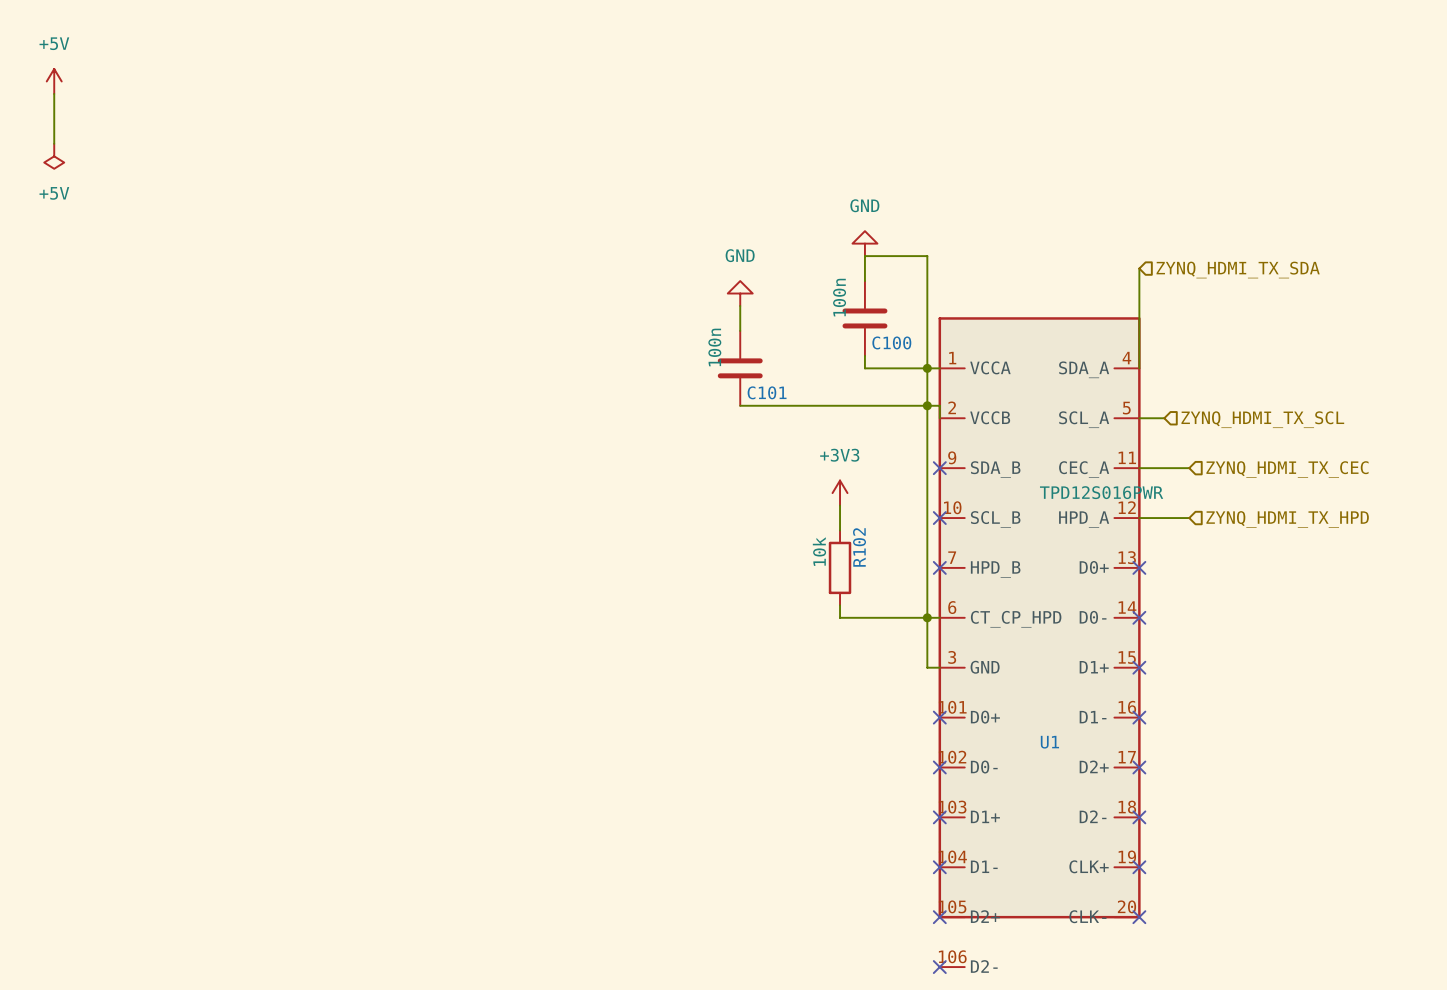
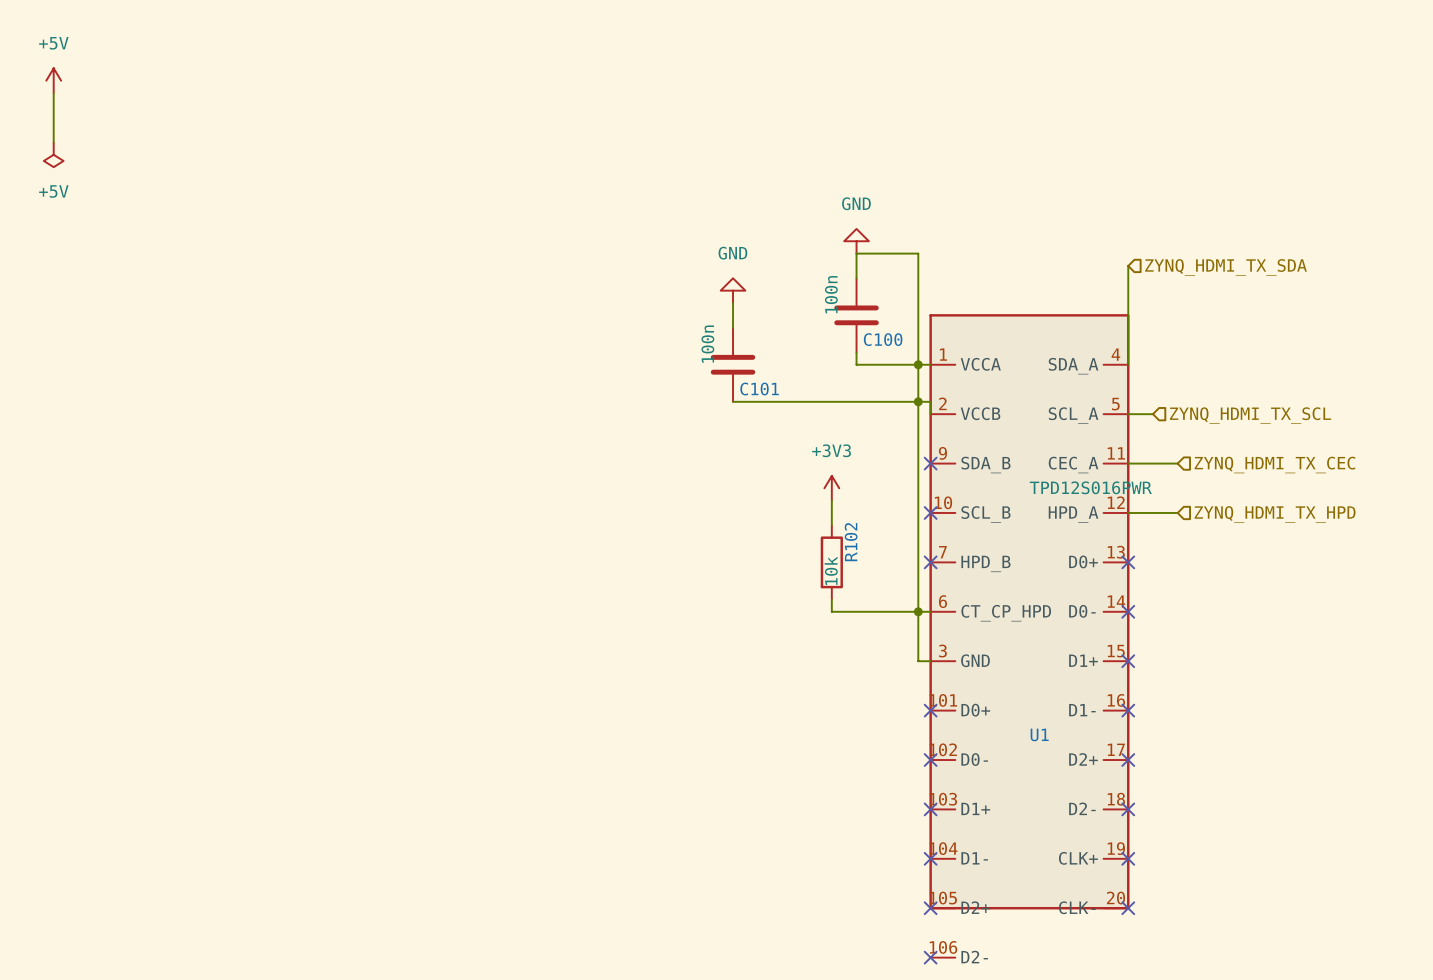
R102 value position: 10k (819, 551) -> 10k (831, 570)

